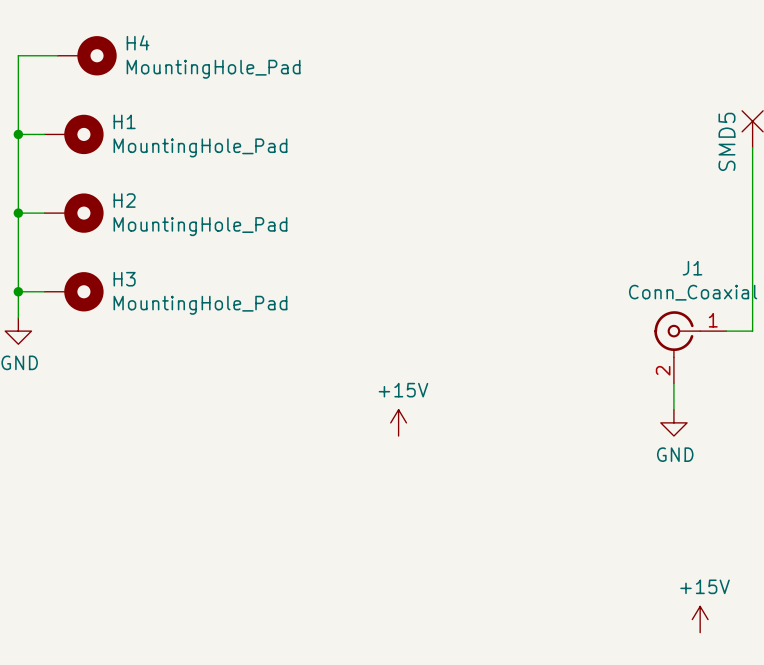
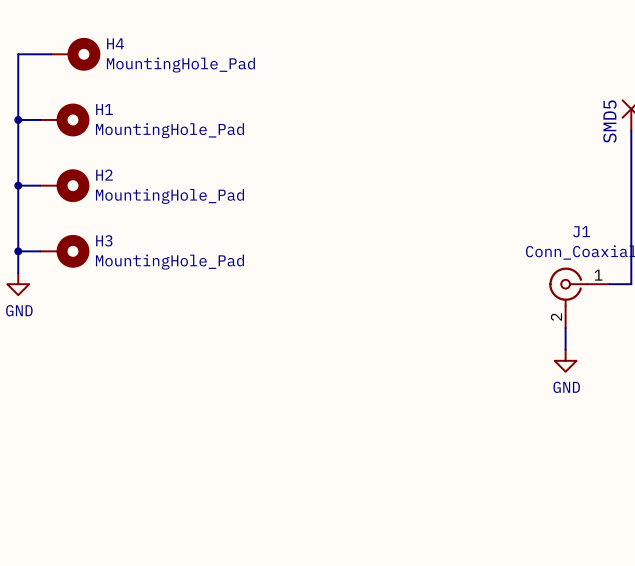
power symbol: +15V (398, 422) -> none
power symbol: +15V (700, 619) -> none

